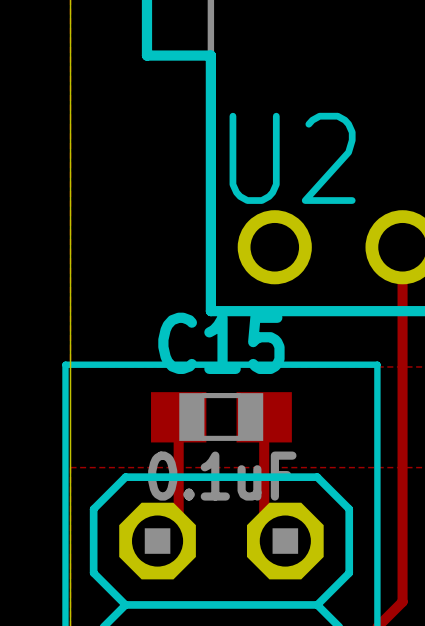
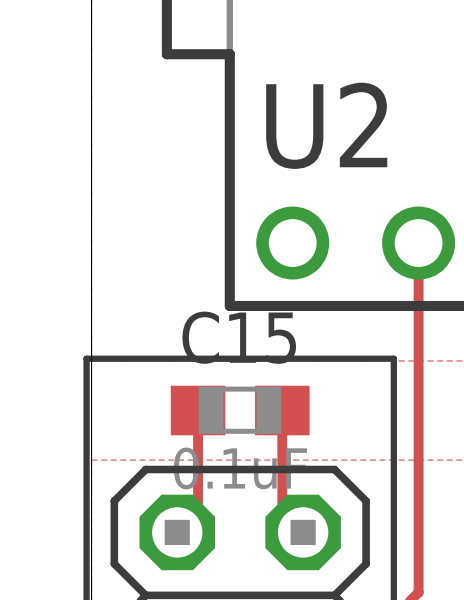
U2 name position: U2 (292, 158) -> U2 (326, 125)

